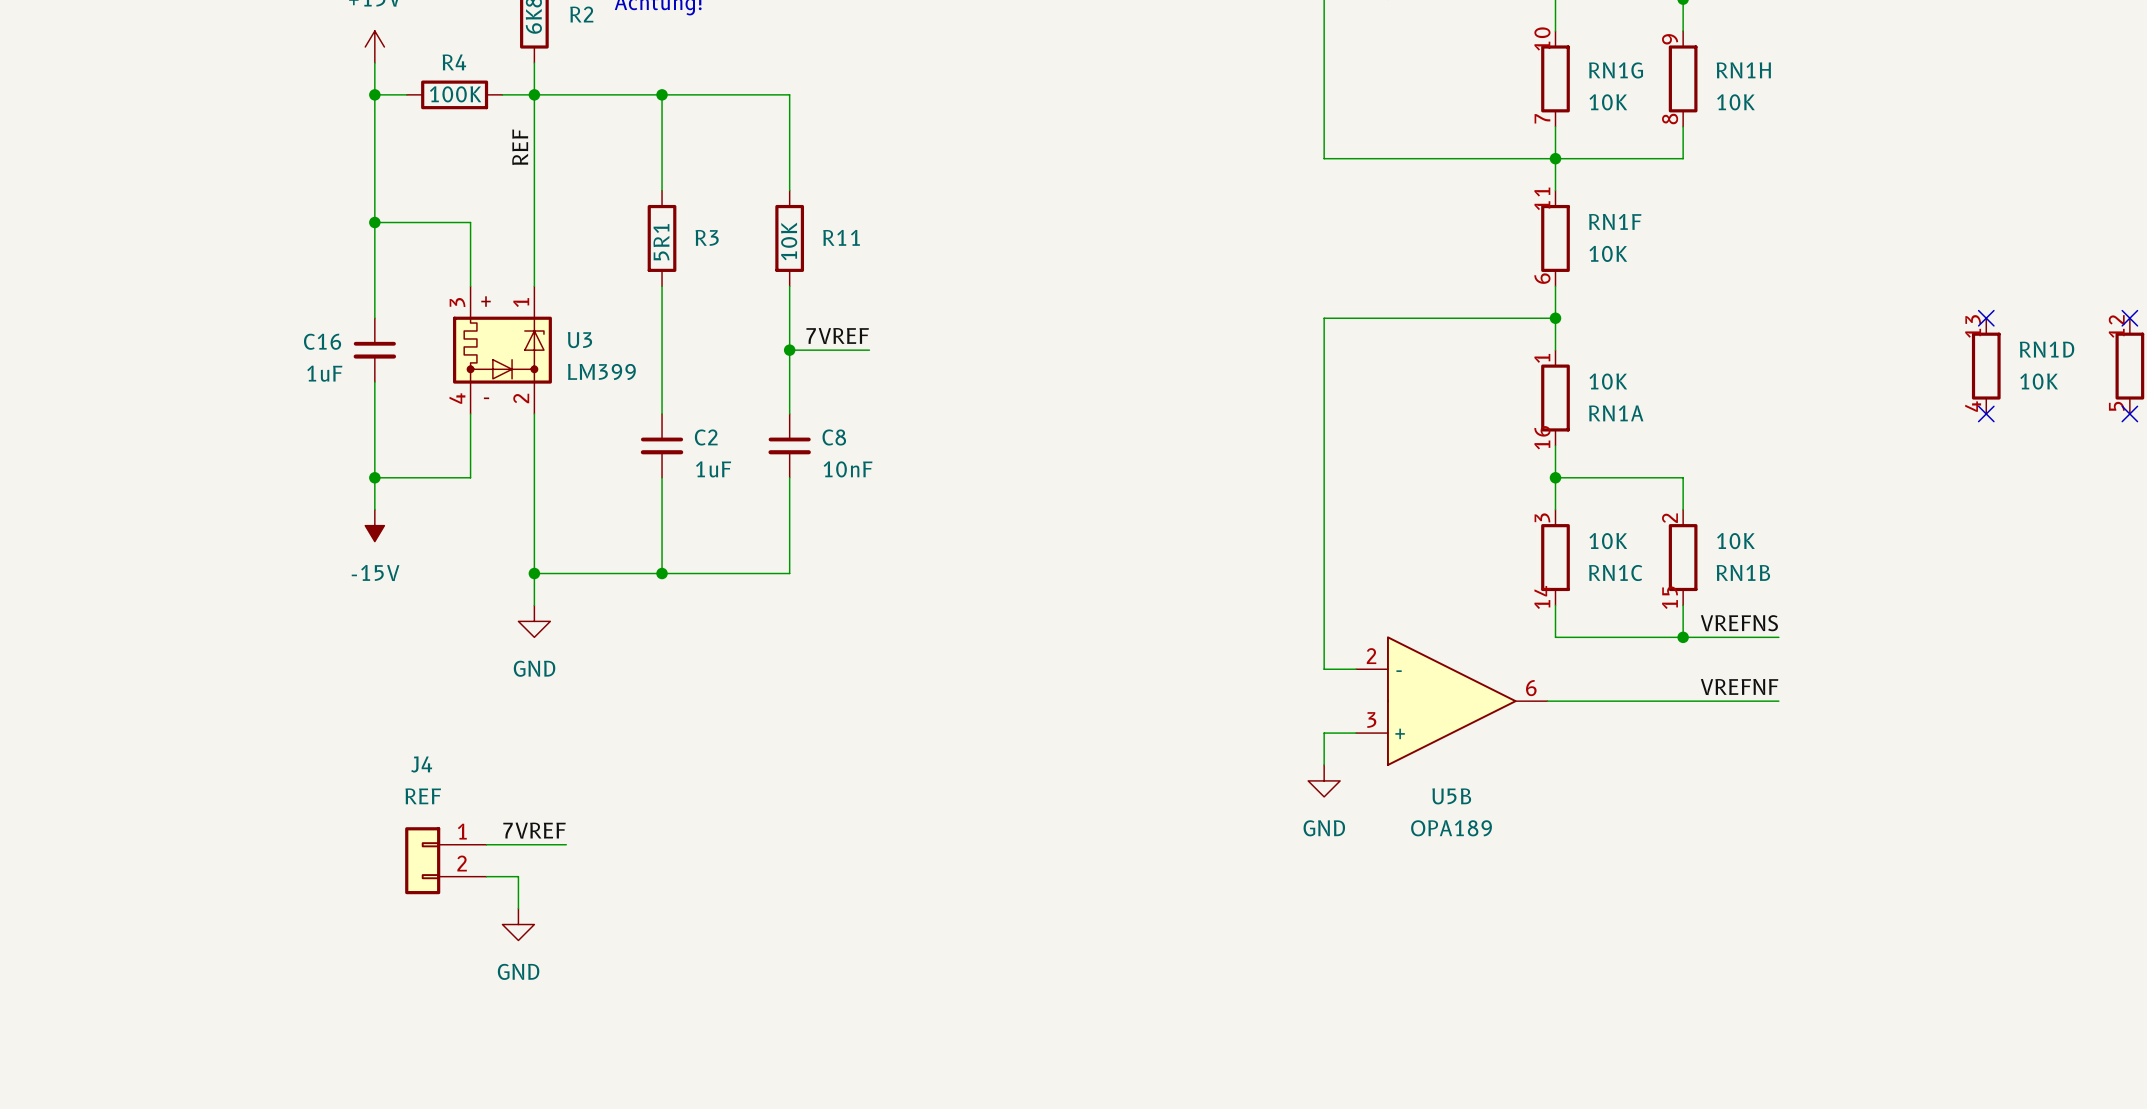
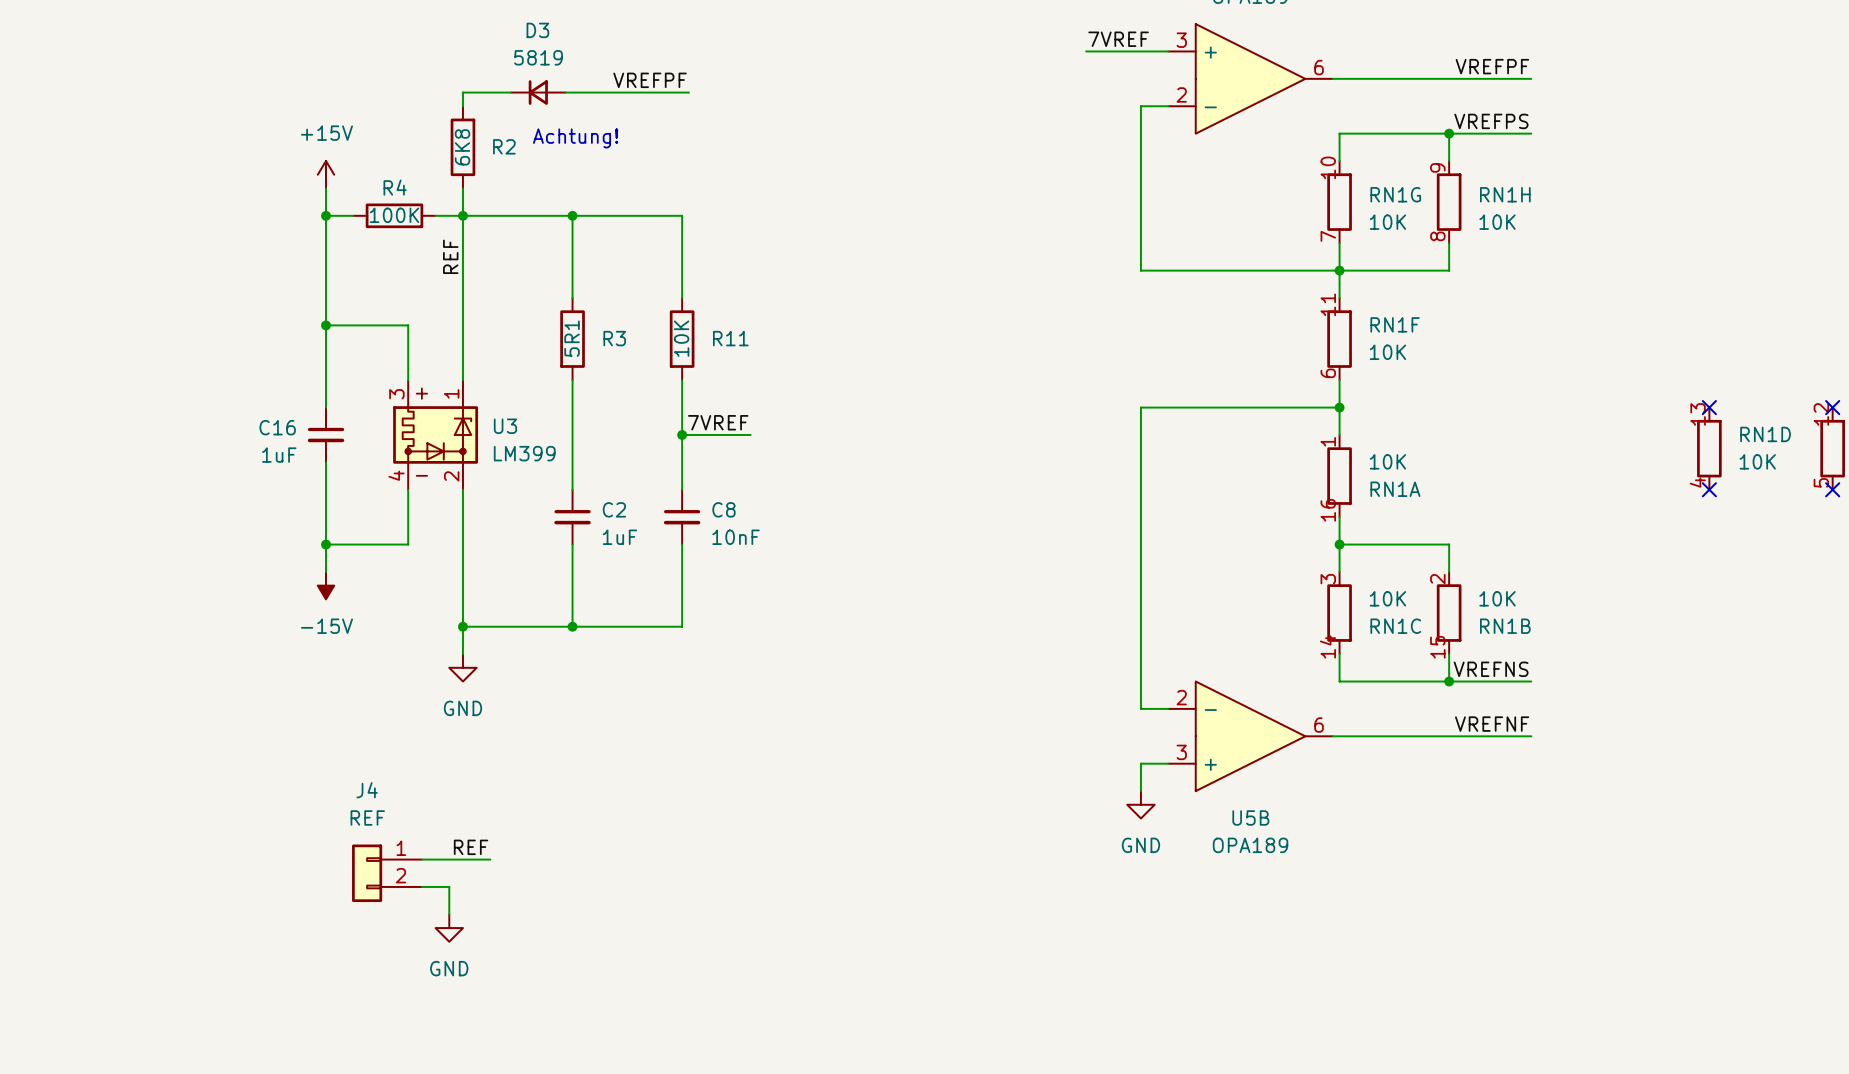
label: 7VREF (534, 830) -> REF (471, 847)

